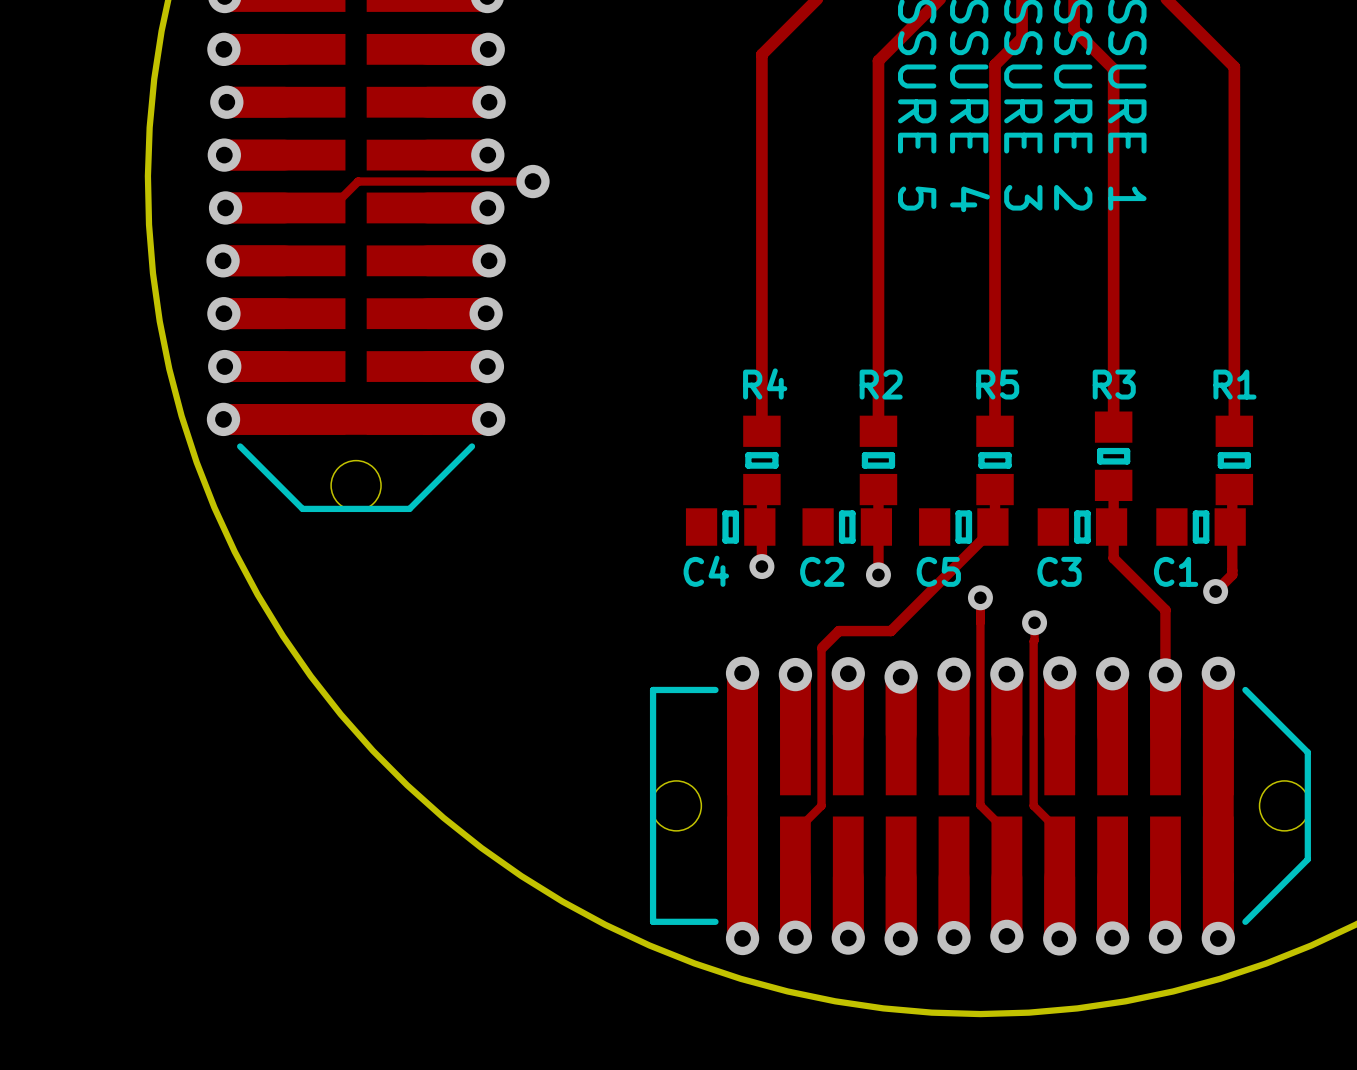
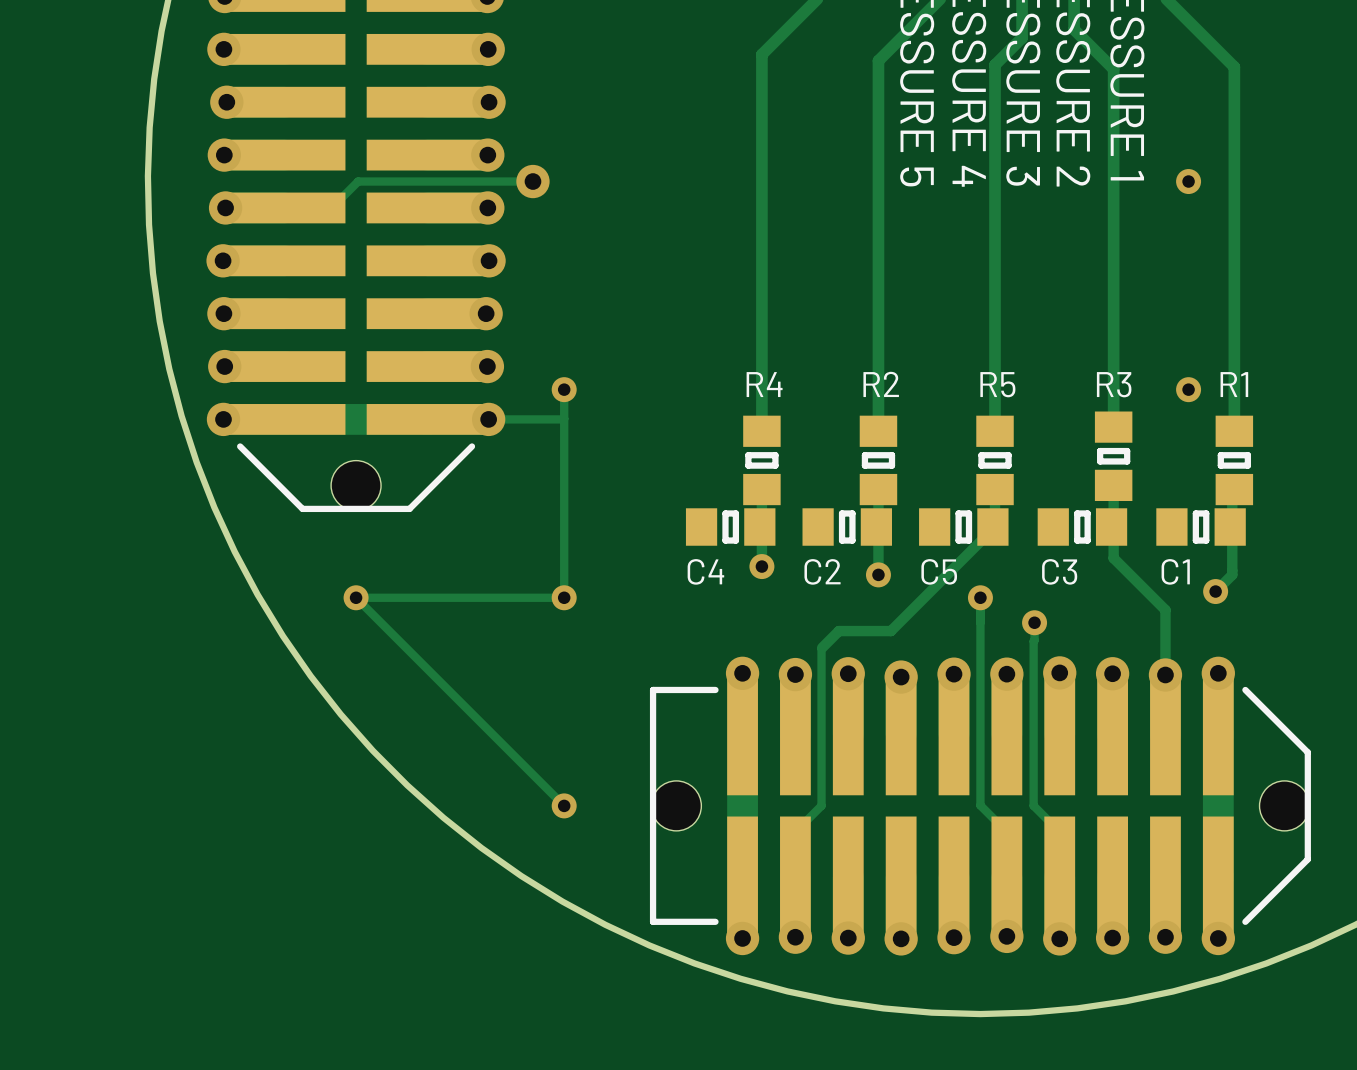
via: none -> (1188, 181)
track: none -> (564, 389) (564, 597) (356, 597) (564, 805)
via: none -> (564, 389)
via: none -> (1188, 389)
track: none -> (564, 418) (488, 419)
via: none -> (356, 597)
via: none -> (564, 597)
via: none -> (564, 805)

